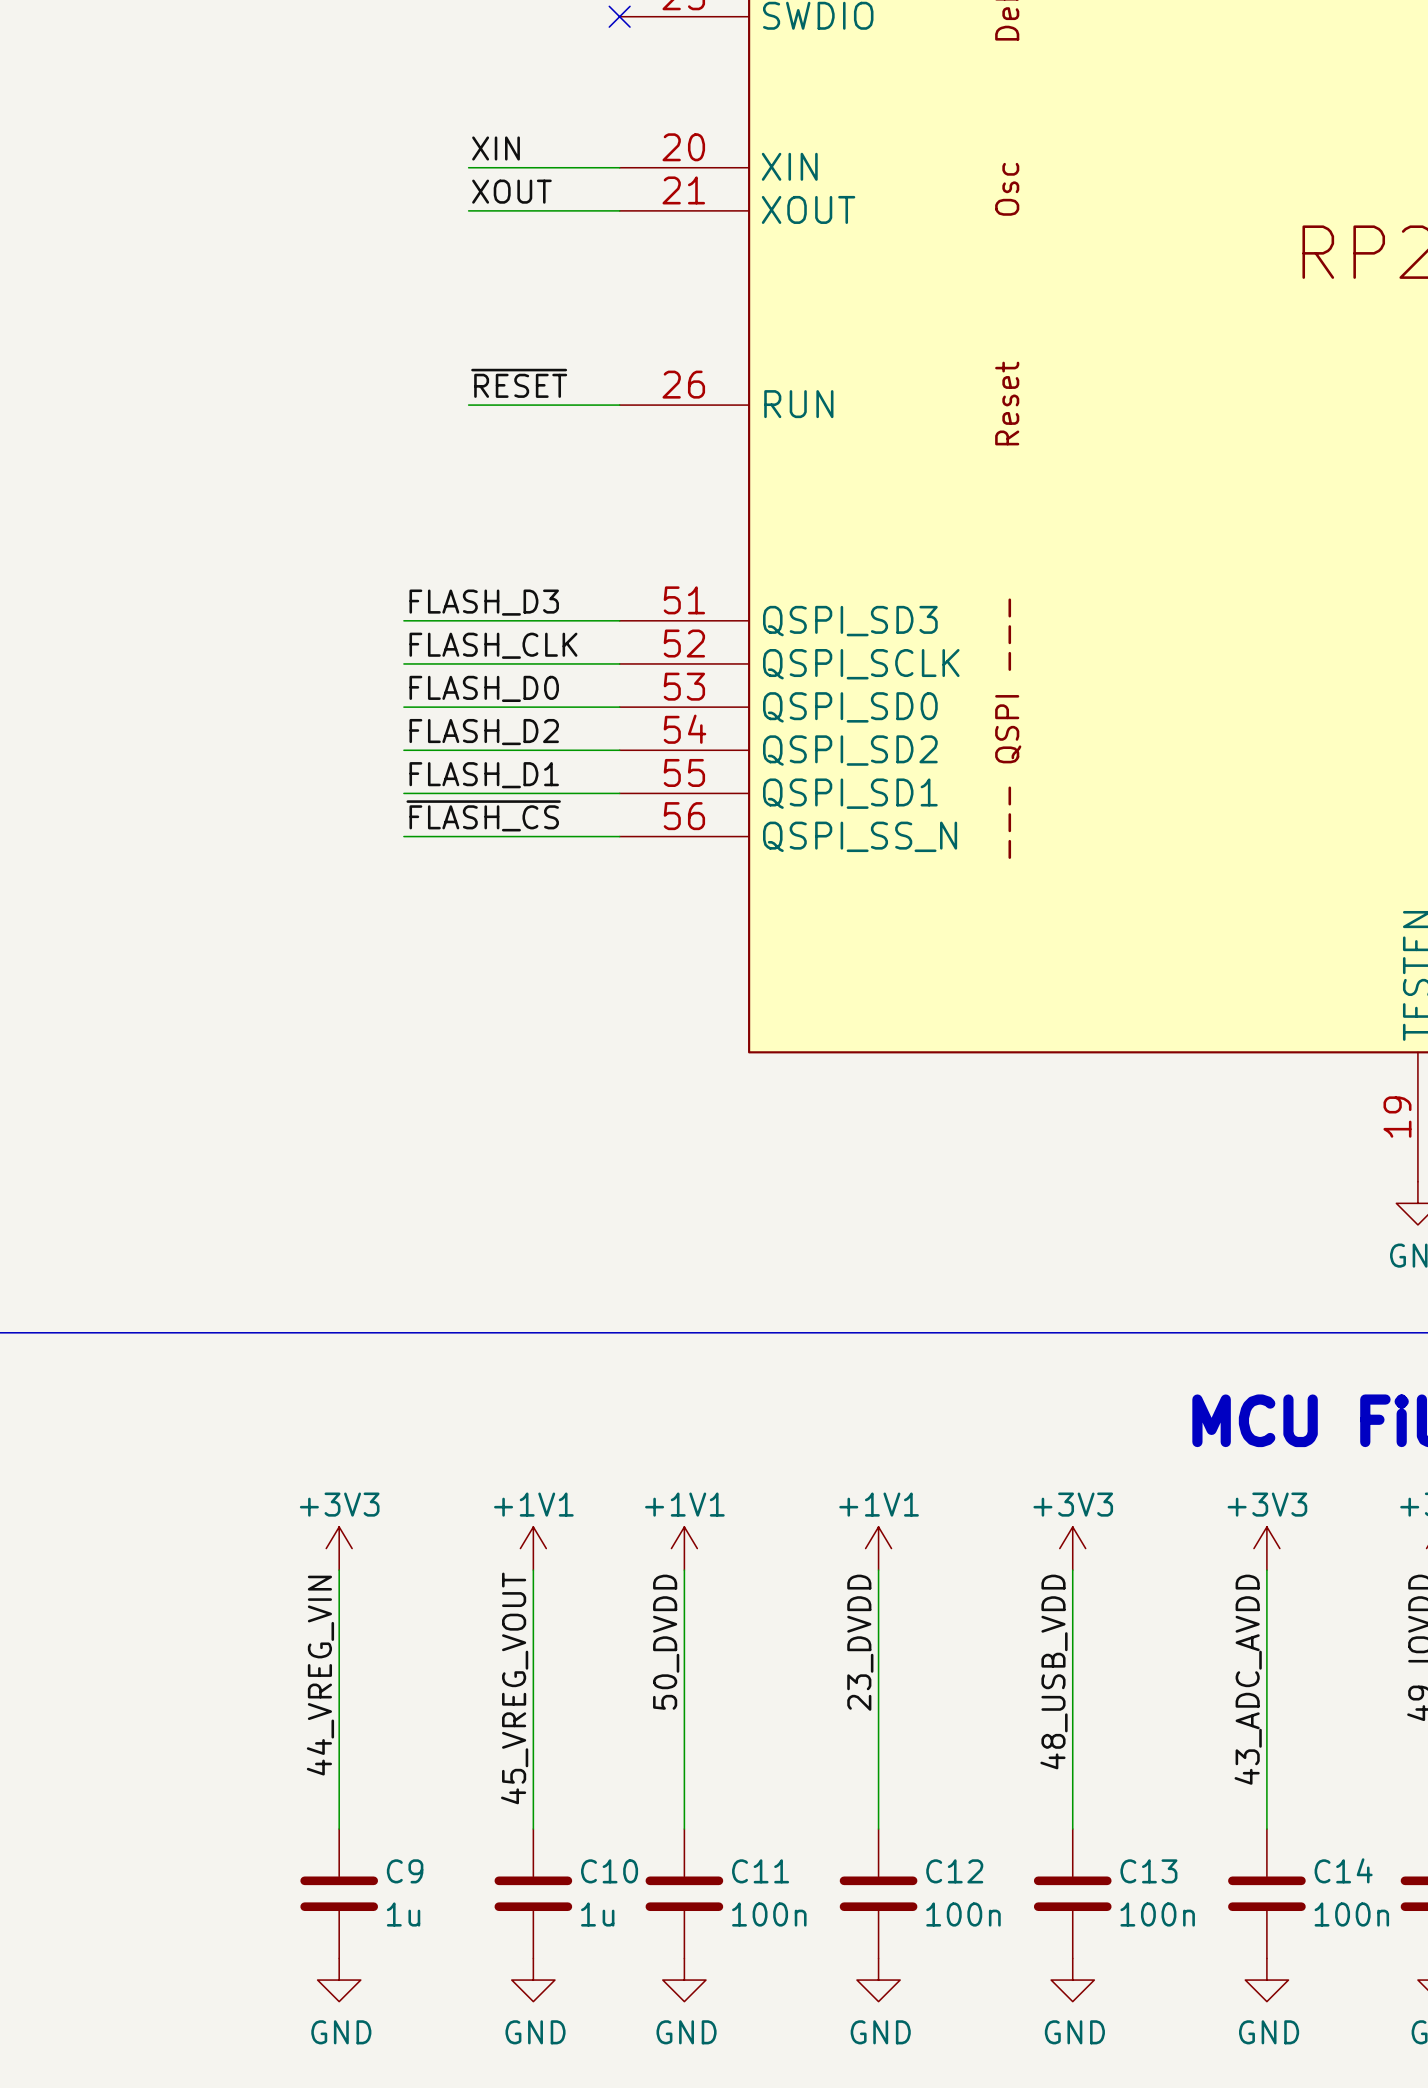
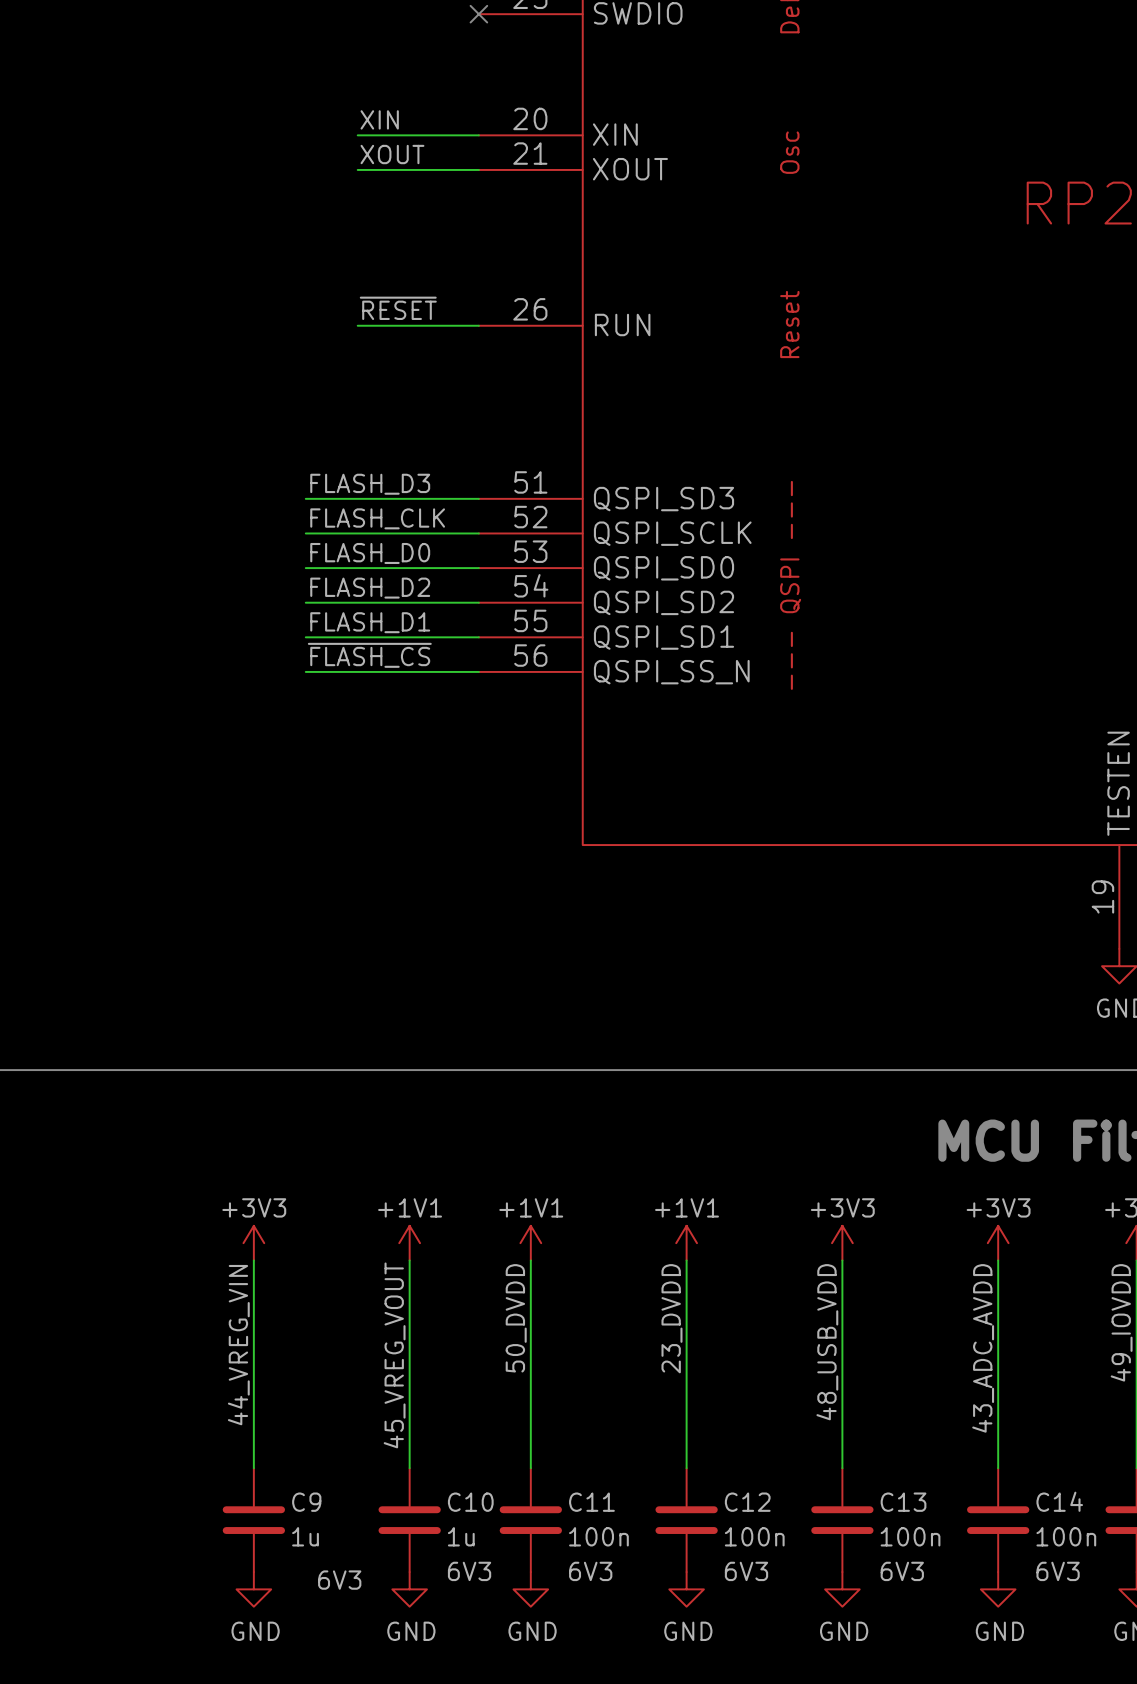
C10 text: none -> 6V3 (469, 1571)
C11 text: none -> 6V3 (590, 1571)
C12 text: none -> 6V3 (746, 1571)
C13 text: none -> 6V3 (902, 1571)
C14 text: none -> 6V3 (1058, 1571)
C9 text: none -> 6V3 (339, 1580)

